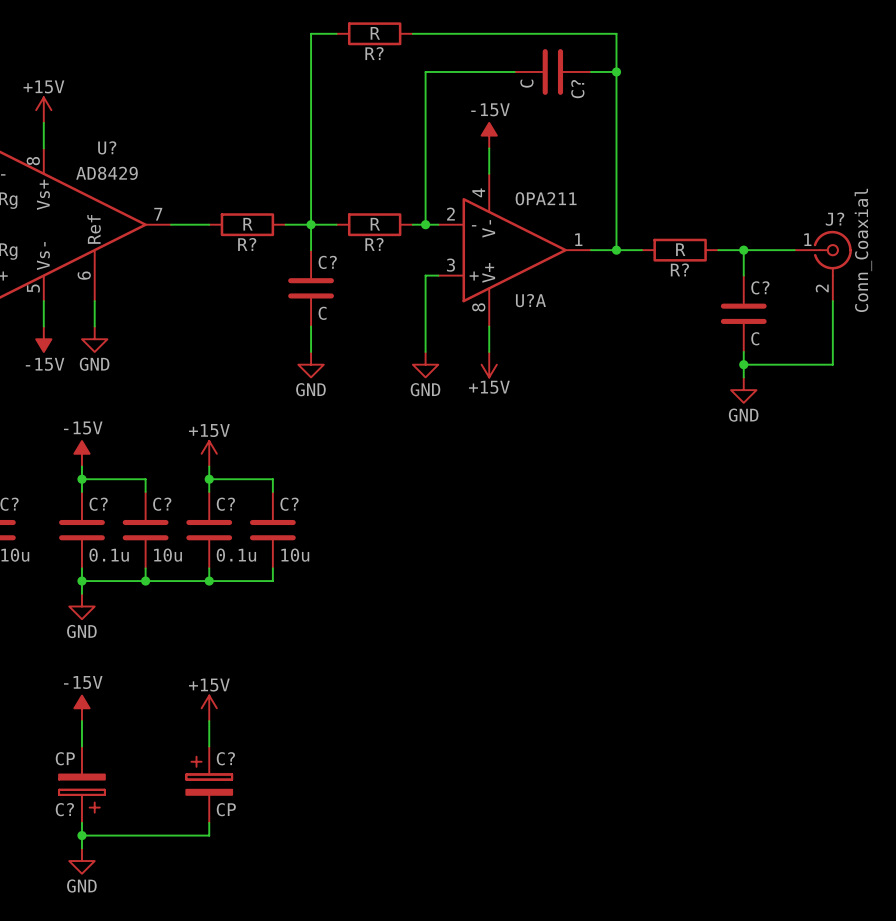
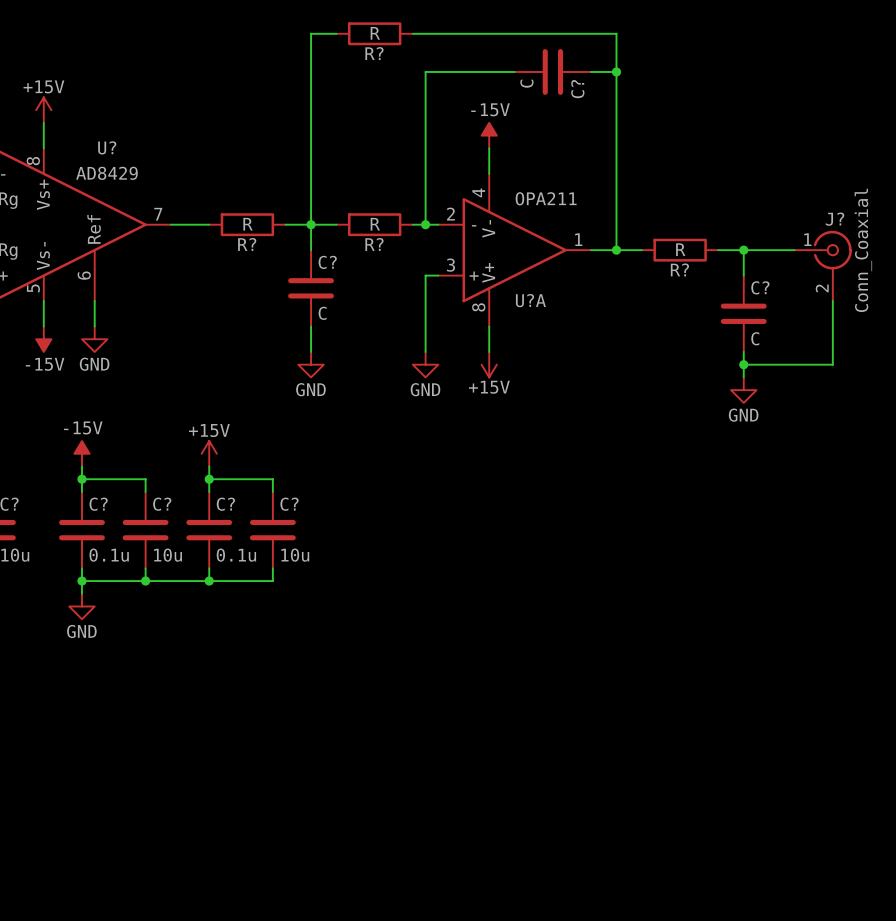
power symbol: -15V (81, 708) -> none
power symbol: +15V (209, 708) -> none
wire: (81, 721) (81, 746) -> none
wire: (209, 721) (209, 746) -> none
C?: CP (81, 784) -> none
C?: CP (209, 784) -> none
wire: (81, 822) (81, 848) -> none
wire: (209, 822) (209, 835) (81, 835) -> none
junction: (81, 835) -> none
power symbol: GND (81, 861) -> none

